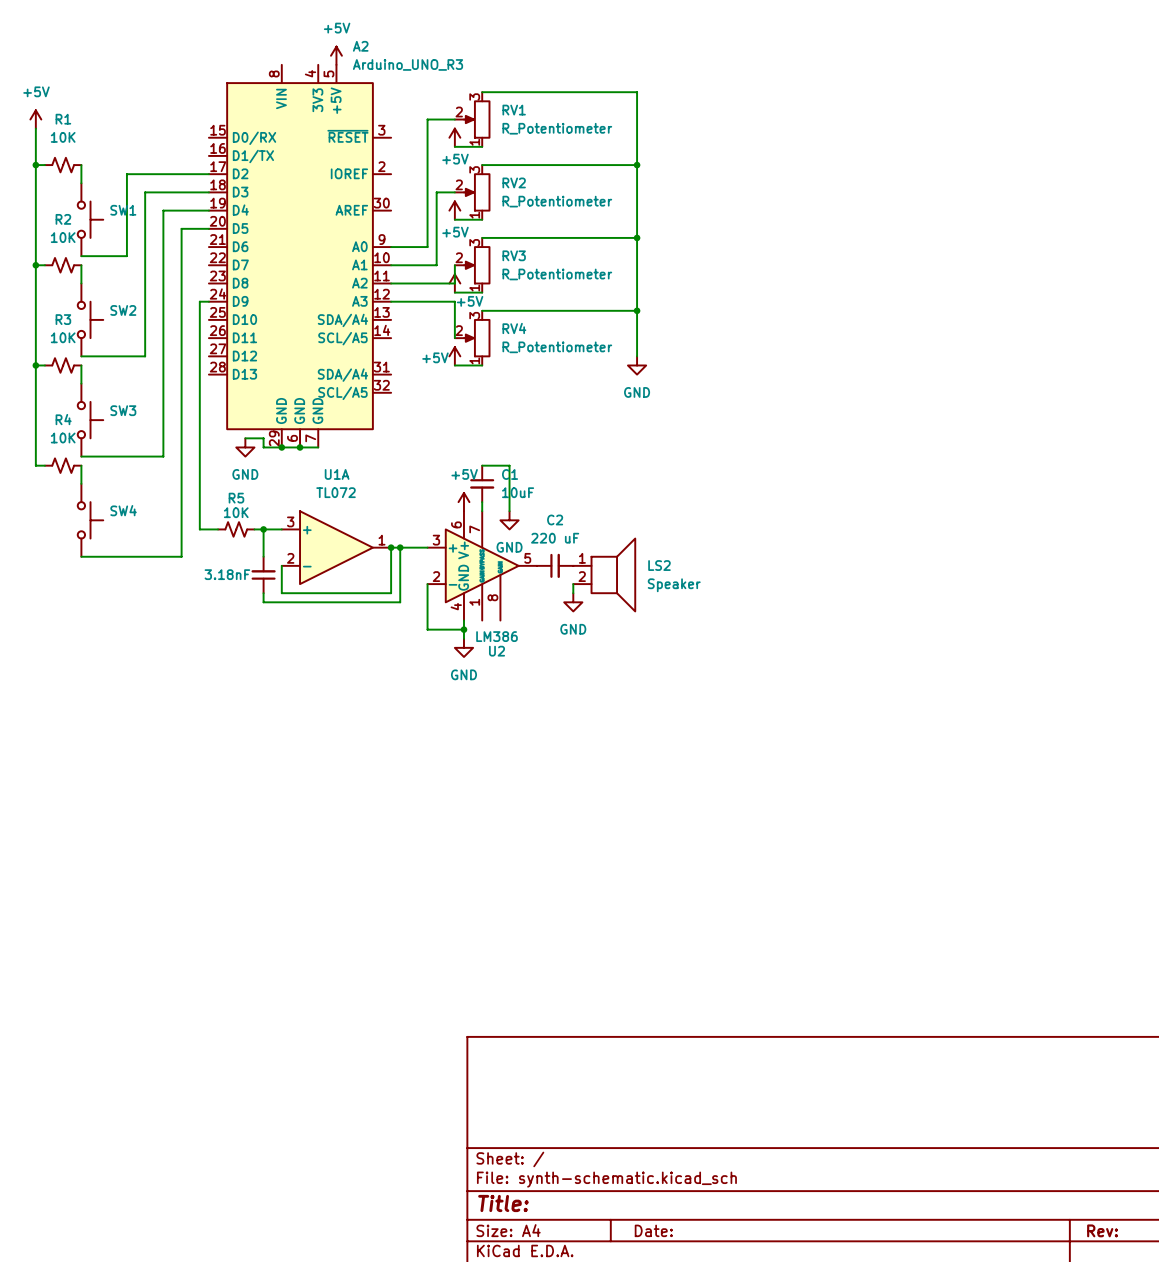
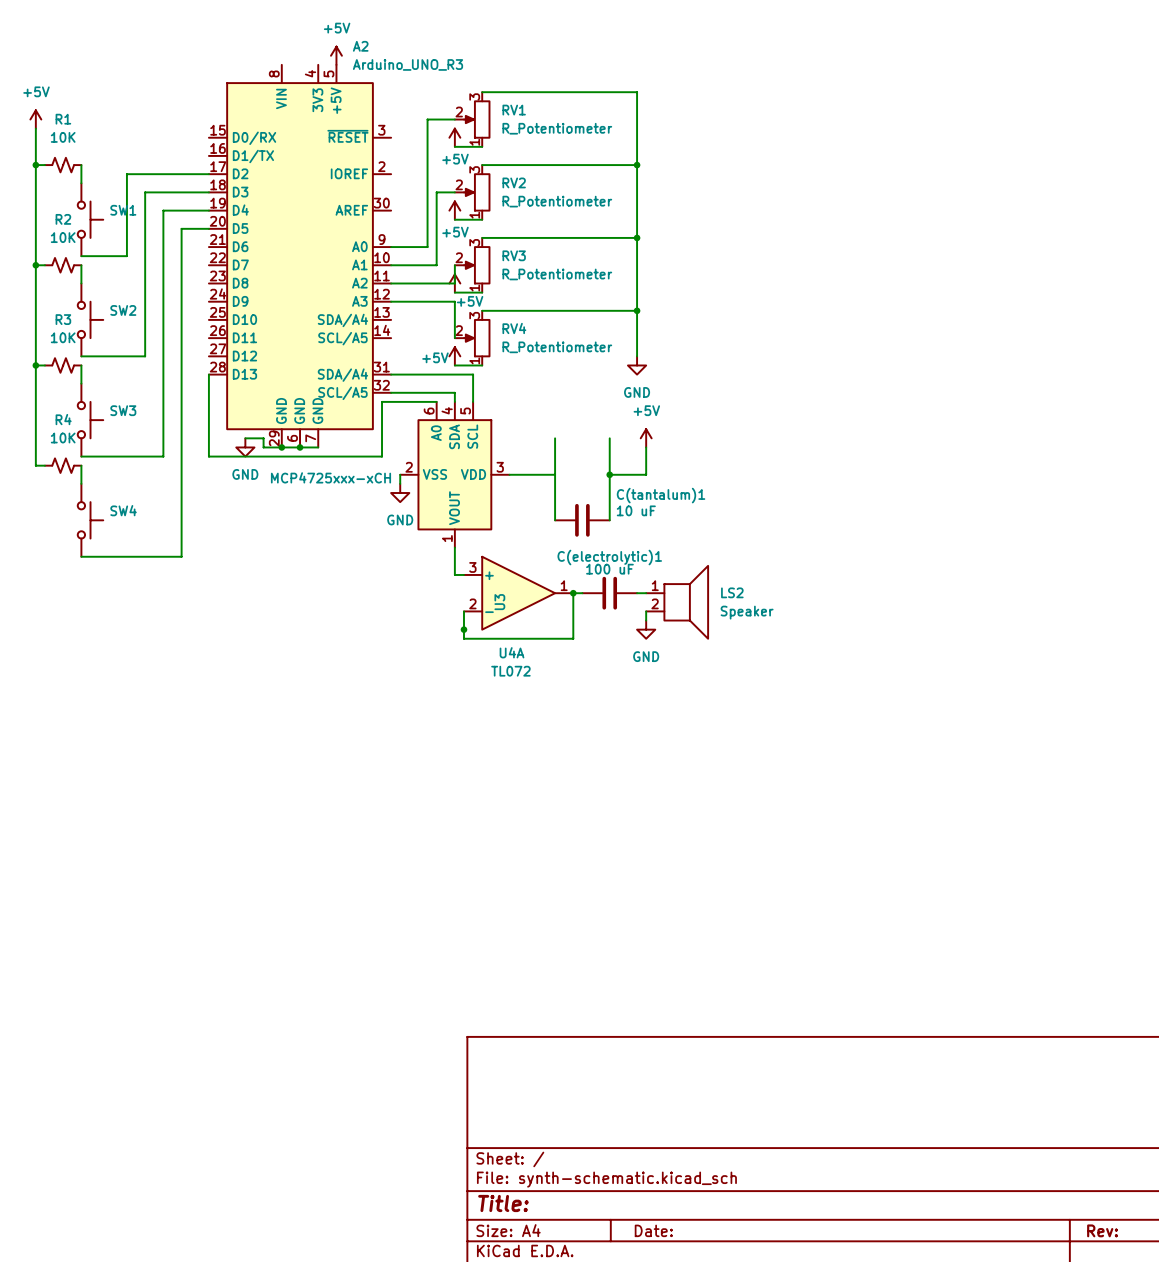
wire: (208, 301) (199, 301) (199, 529) (218, 529) -> none
wire: none -> (208, 374) (208, 456) (382, 456) (382, 401) (436, 401)
wire: none -> (391, 374) (473, 374) (473, 401)
wire: none -> (391, 392) (454, 392) (454, 401)
wire: none -> (555, 438) (555, 520)
wire: none -> (609, 438) (609, 520)
power symbol: none -> +5V (646, 438)
wire: none -> (646, 447) (646, 474) (609, 474)
wire: (482, 465) (509, 465) (509, 511) -> none
U3: none -> MCP4725xxx-xCH (454, 474)
wire: none -> (509, 474) (555, 474)
junction: none -> (609, 474)
C1: 10uF (482, 483) -> none
power symbol: none -> GND (400, 493)
power symbol: +5V (463, 502) -> none
power symbol: GND (509, 520) -> none
C(tantalum)1: none -> 10 uF (582, 520)
R5: 10K (236, 529) -> none
wire: (254, 529) (281, 529) -> none
wire: (263, 529) (263, 556) -> none
junction: (263, 529) -> none
U1A: TL072 (336, 547) -> none
junction: (391, 547) -> none
wire: (400, 547) (400, 602) (263, 602) (263, 593) -> none
junction: (400, 547) -> none
wire: (427, 547) (391, 547) (391, 593) (281, 593) (281, 565) -> none
U2: LM386 (482, 565) -> none
C2: 220 uF (555, 565) -> none
part: 3.18nF (263, 574) -> none
LS2 position: (604, 574) -> (677, 602)
wire: (427, 584) (427, 629) (463, 629) -> none
wire: (573, 584) (573, 593) -> (646, 611) (646, 620)
U4A: none -> TL072 (518, 593)
junction: none -> (573, 593)
wire: none -> (582, 593) (573, 593) (573, 638) (463, 638)
C(electrolytic)1: none -> 100 uF (609, 593)
wire: none -> (637, 593) (646, 593)
power symbol position: GND (573, 602) -> GND (646, 629)
power symbol: GND (463, 647) -> none

